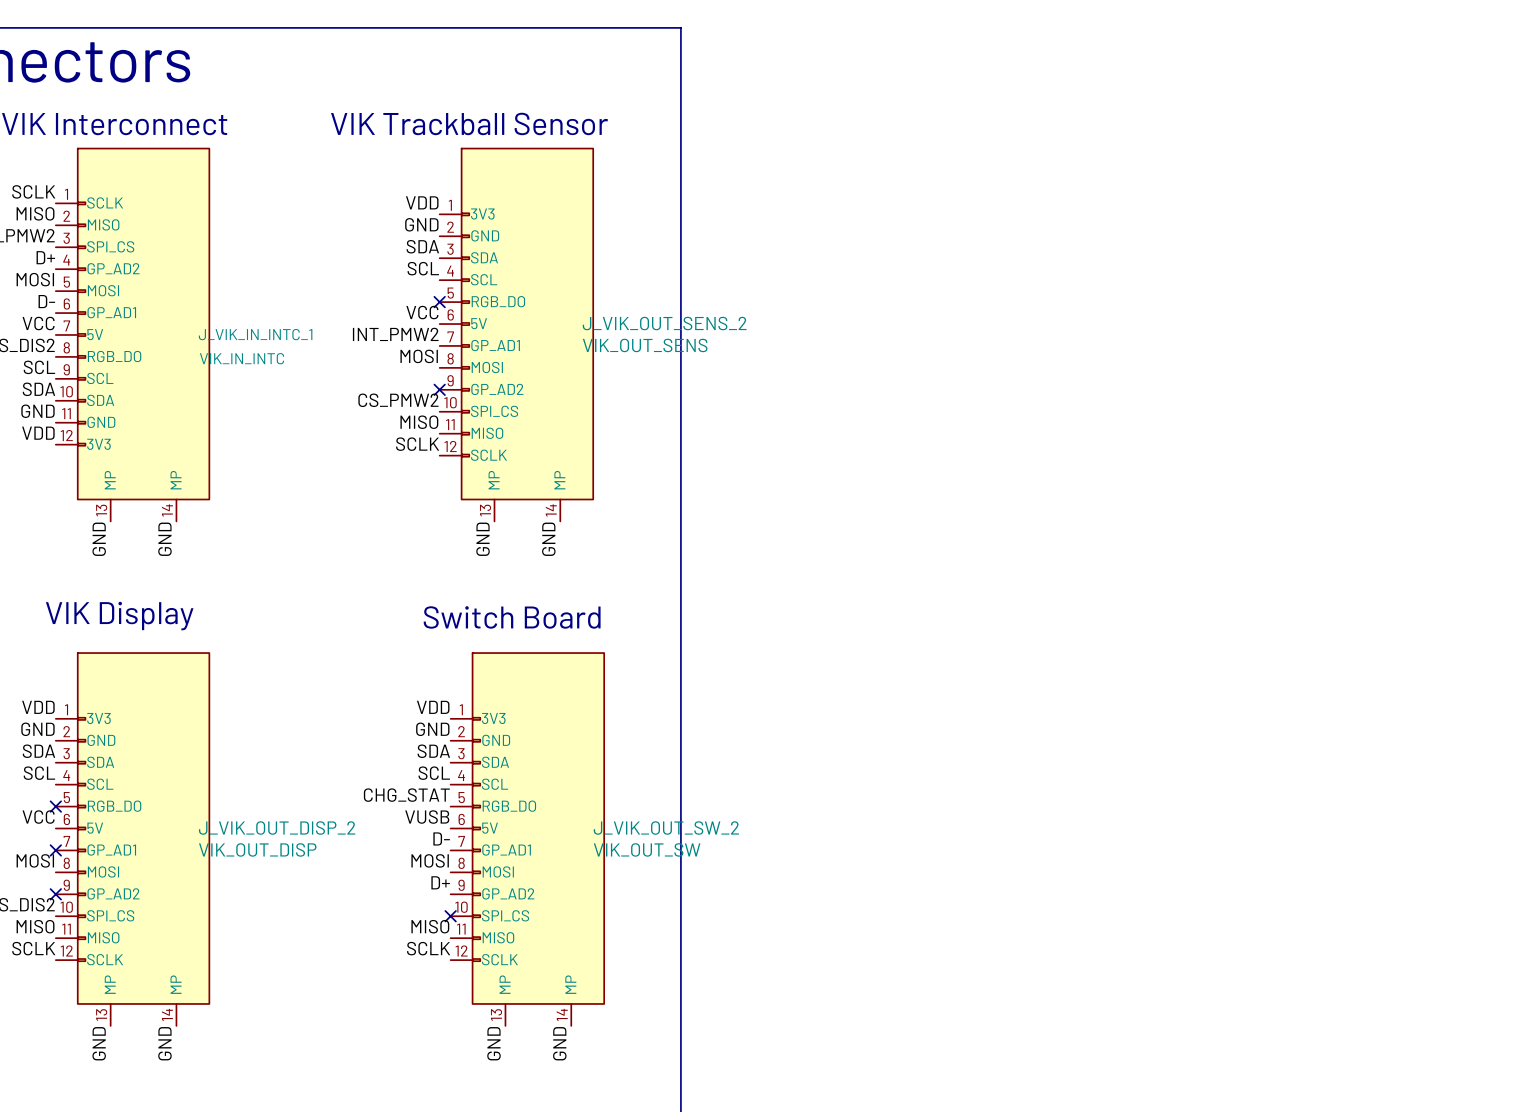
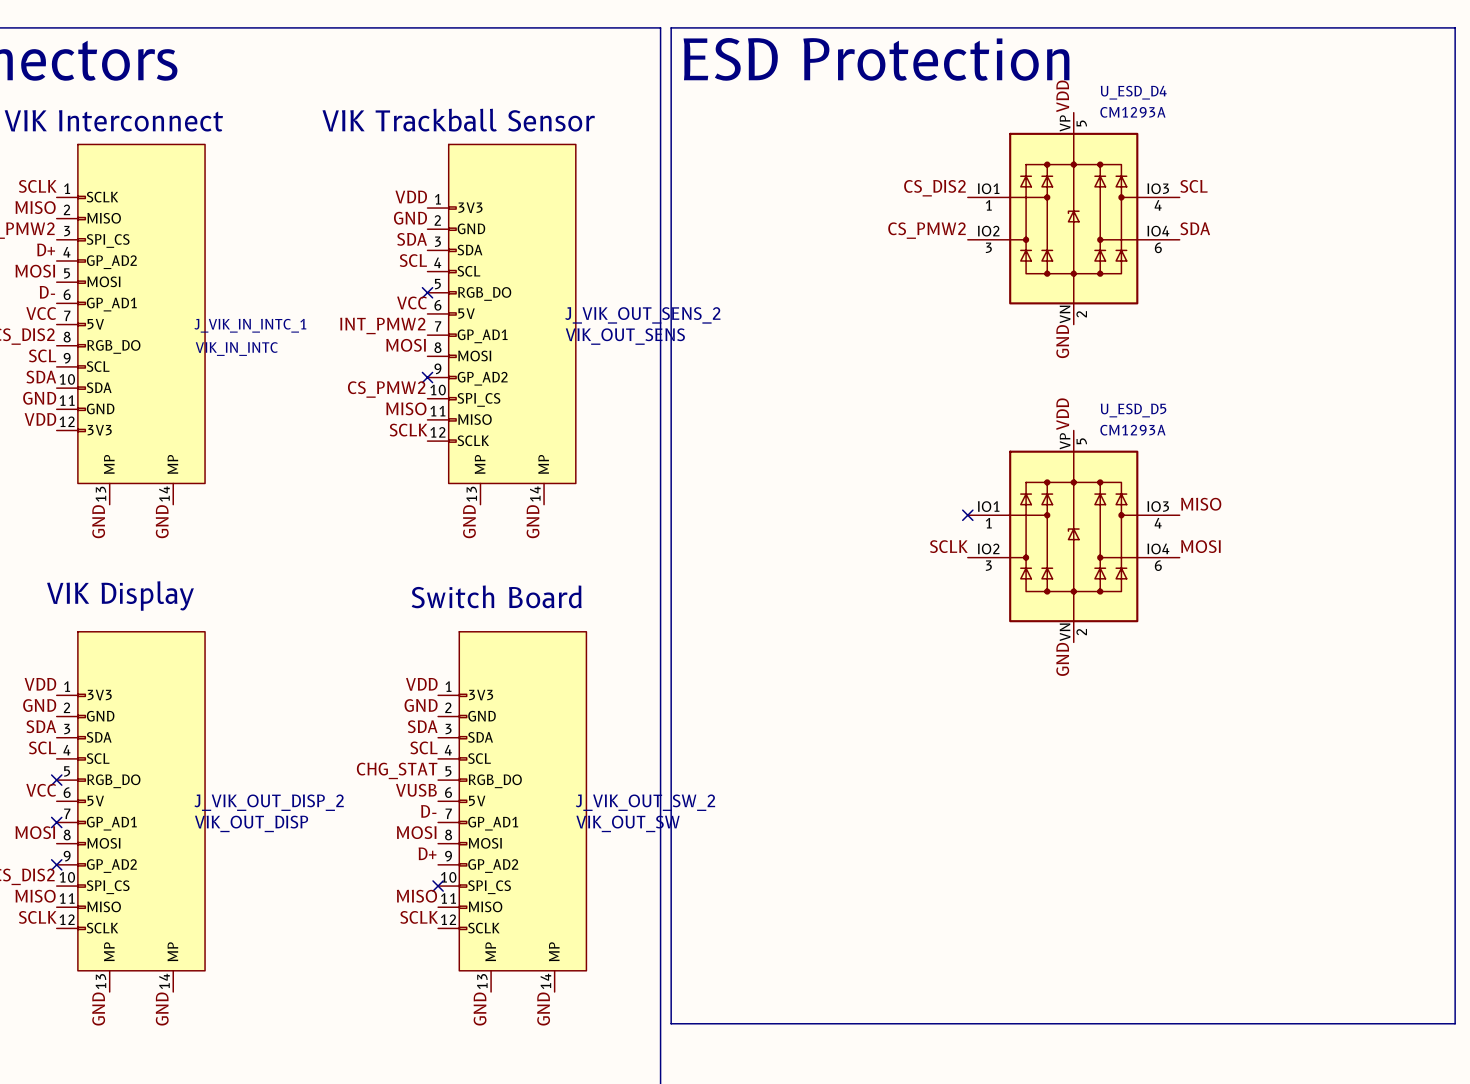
line: none -> (671, 27) (1455, 27) (1455, 1023) (671, 1023) (671, 27)
text: none -> ESD Protection (876, 59)
label: none -> VDD (1062, 96)
label: none -> CS_DIS2 (934, 188)
label: none -> SCL (1193, 186)
U_ESD_D4: none -> CM1293A (1073, 218)
label: none -> CS_PMW2 (927, 230)
label: none -> SDA (1195, 228)
label: none -> GND (1062, 341)
label: none -> VDD (1062, 414)
label: none -> MISO (1201, 504)
no-connect mark: none -> (967, 515)
U_ESD_D5: none -> CM1293A (1073, 536)
label: none -> SCLK (948, 546)
label: none -> MOSI (1200, 546)
label: none -> GND (1062, 659)

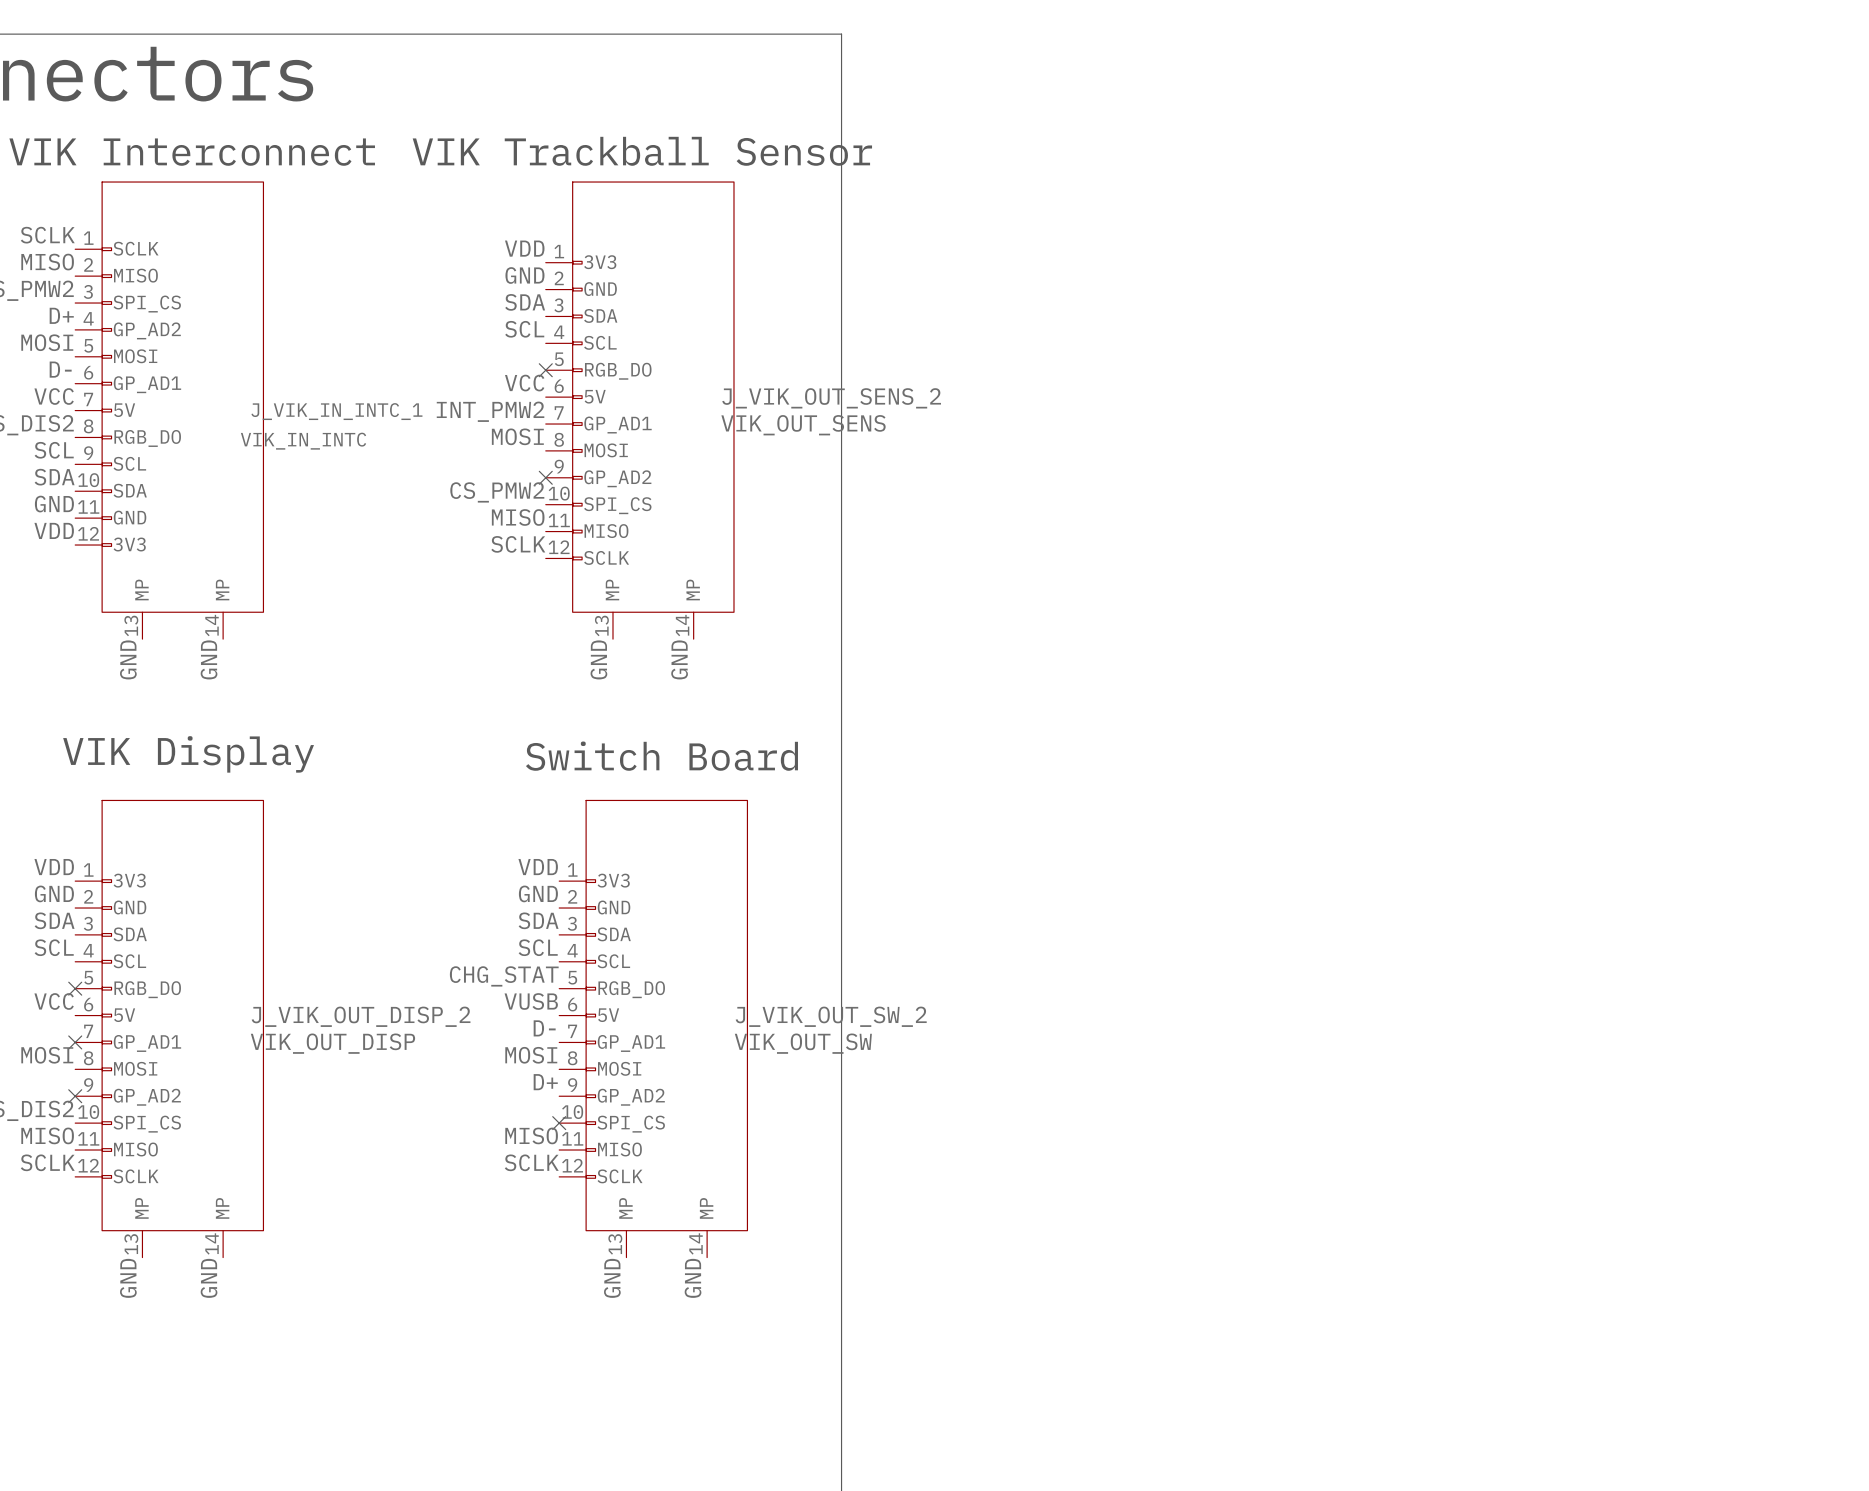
line: (671, 27) (1455, 27) (1455, 1023) (671, 1023) (671, 27) -> none
text: ESD Protection (876, 59) -> none
label: VDD (1062, 96) -> none
label: SCL (1193, 186) -> none
label: CS_DIS2 (934, 188) -> none
U_ESD_D4: CM1293A (1073, 218) -> none
label: SDA (1195, 228) -> none
label: CS_PMW2 (927, 230) -> none
label: GND (1062, 341) -> none
label: VDD (1062, 414) -> none
label: MISO (1201, 504) -> none
no-connect mark: (967, 515) -> none
U_ESD_D5: CM1293A (1073, 536) -> none
label: SCLK (948, 546) -> none
label: MOSI (1200, 546) -> none
label: GND (1062, 659) -> none

